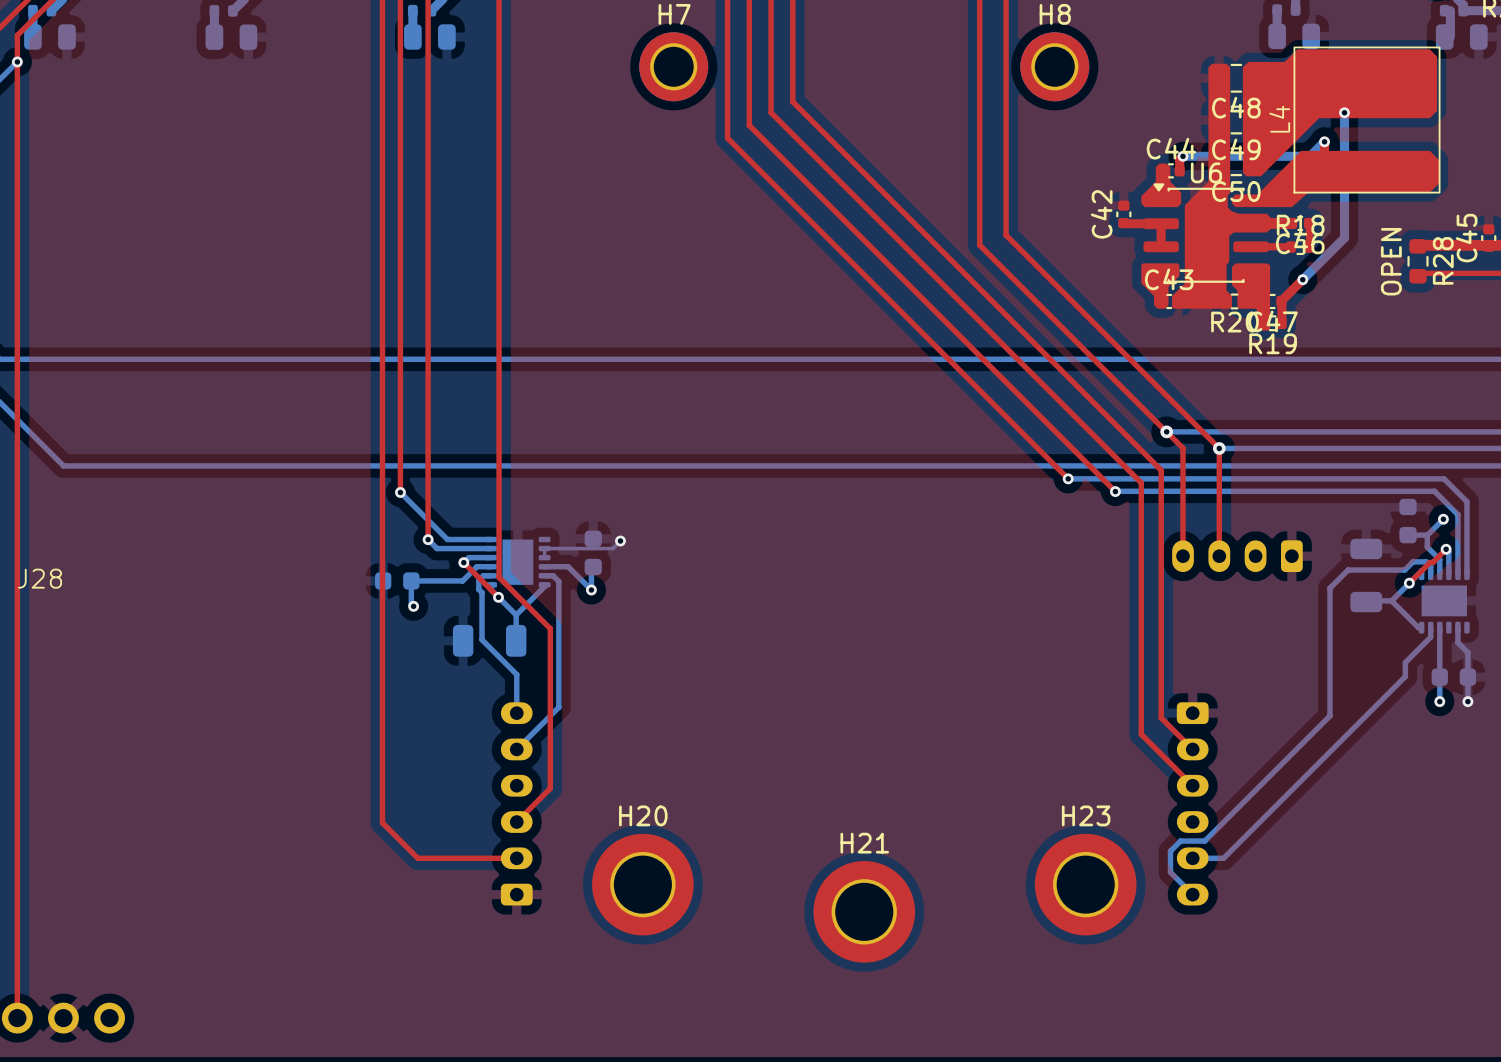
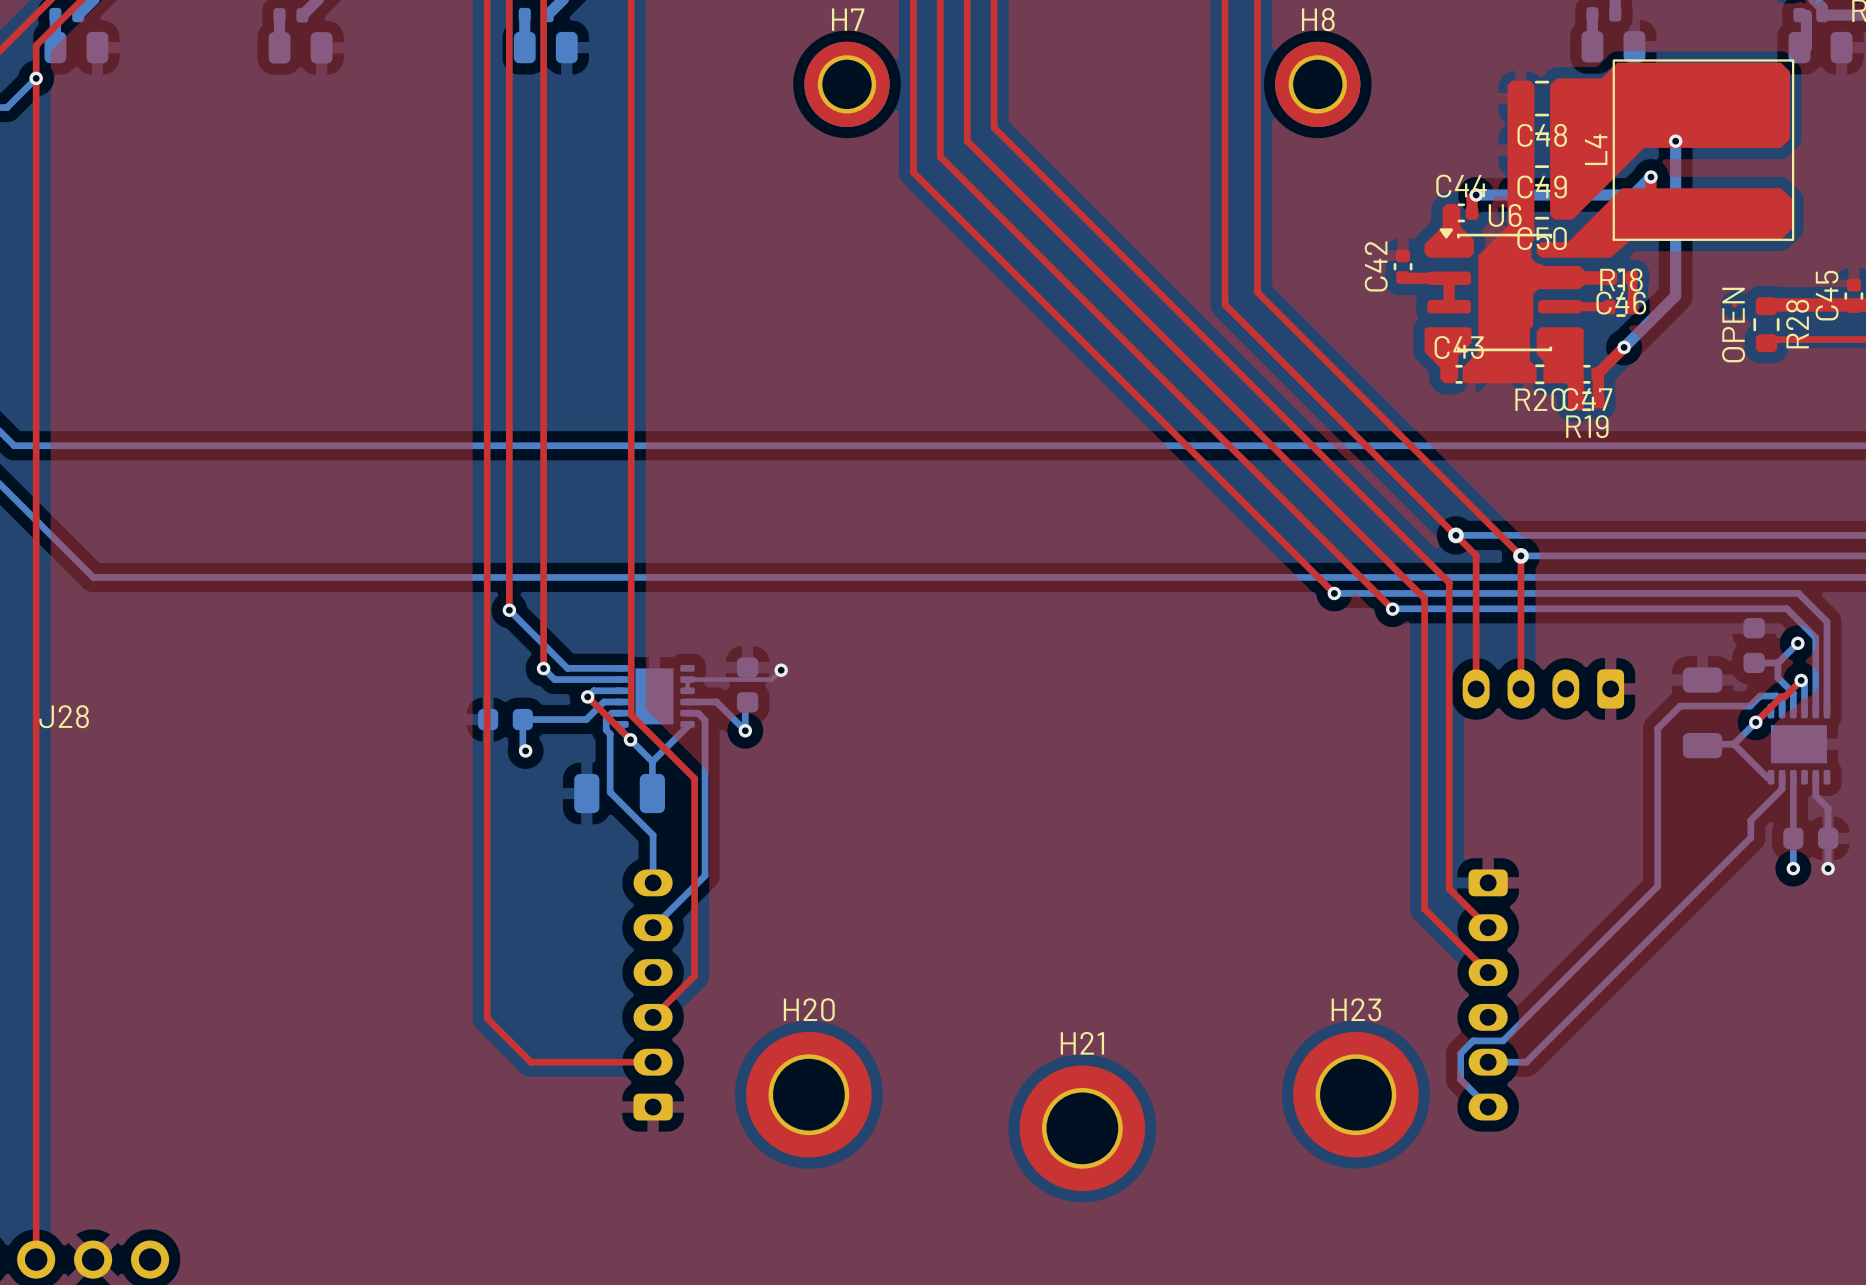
top track: none -> (1735, 304) (1734, 305)

